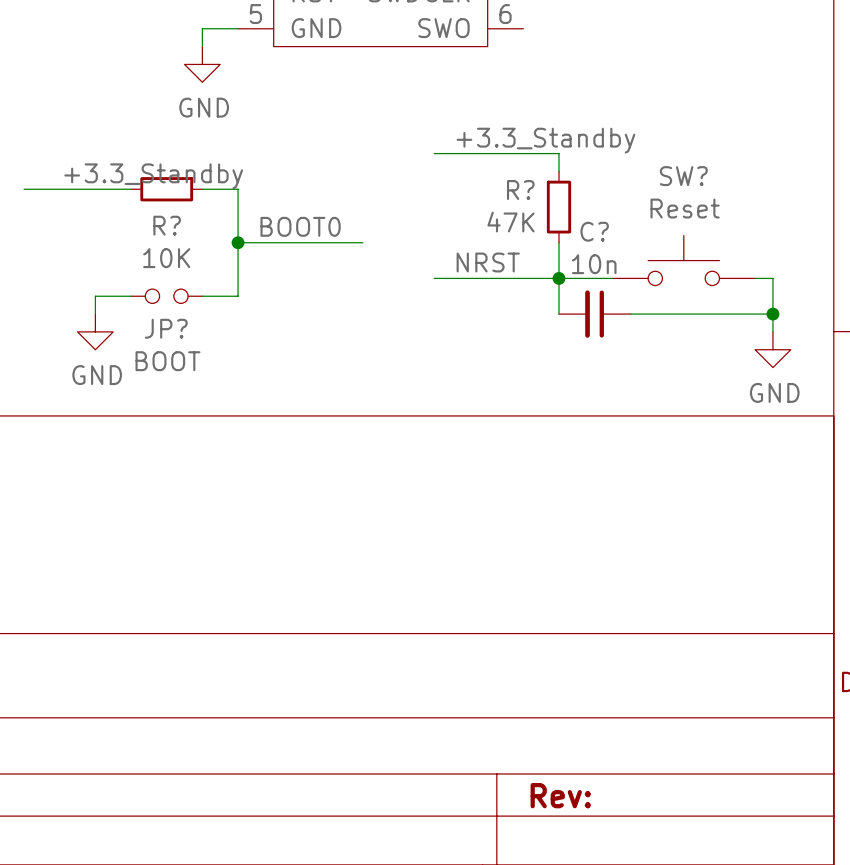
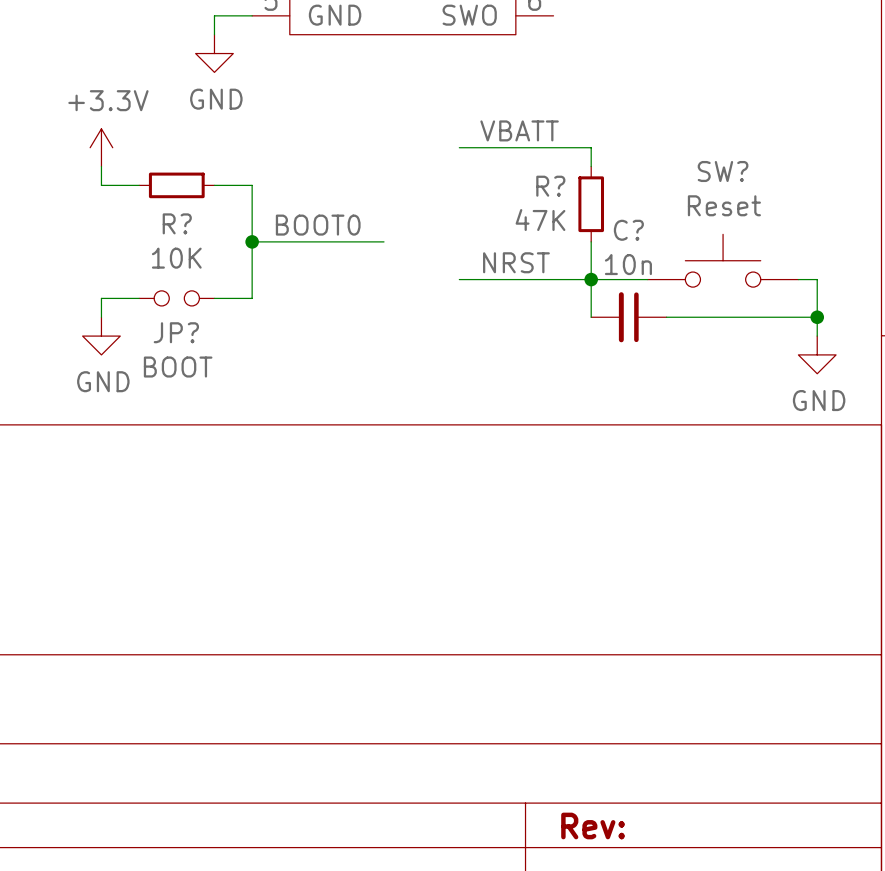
label: +3.3_Standby (545, 140) -> VBATT (519, 130)
power symbol: none -> +3.3V (101, 147)
label: +3.3_Standby (153, 176) -> none
wire: (24, 189) (95, 189) -> (101, 166) (101, 185)

